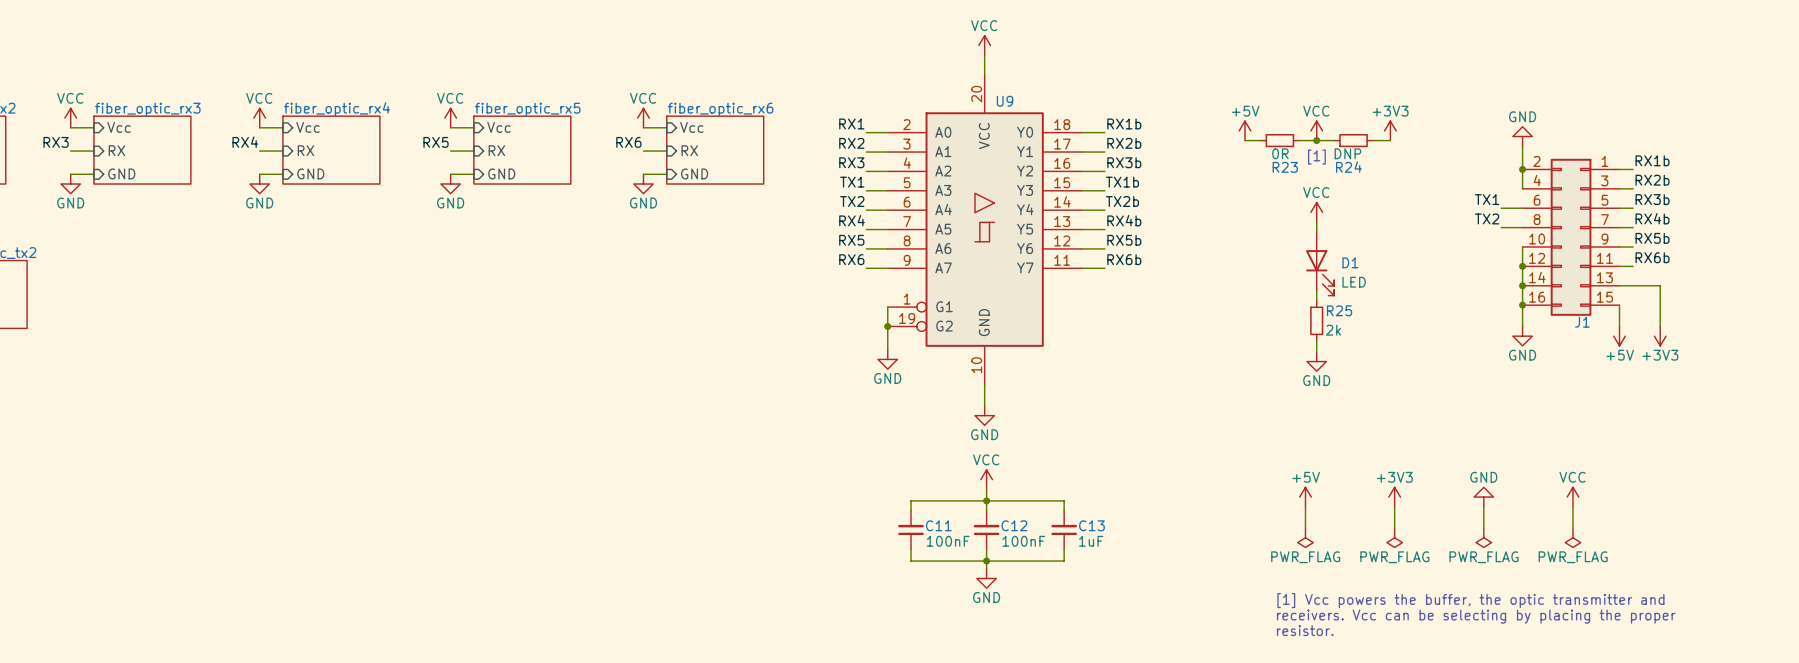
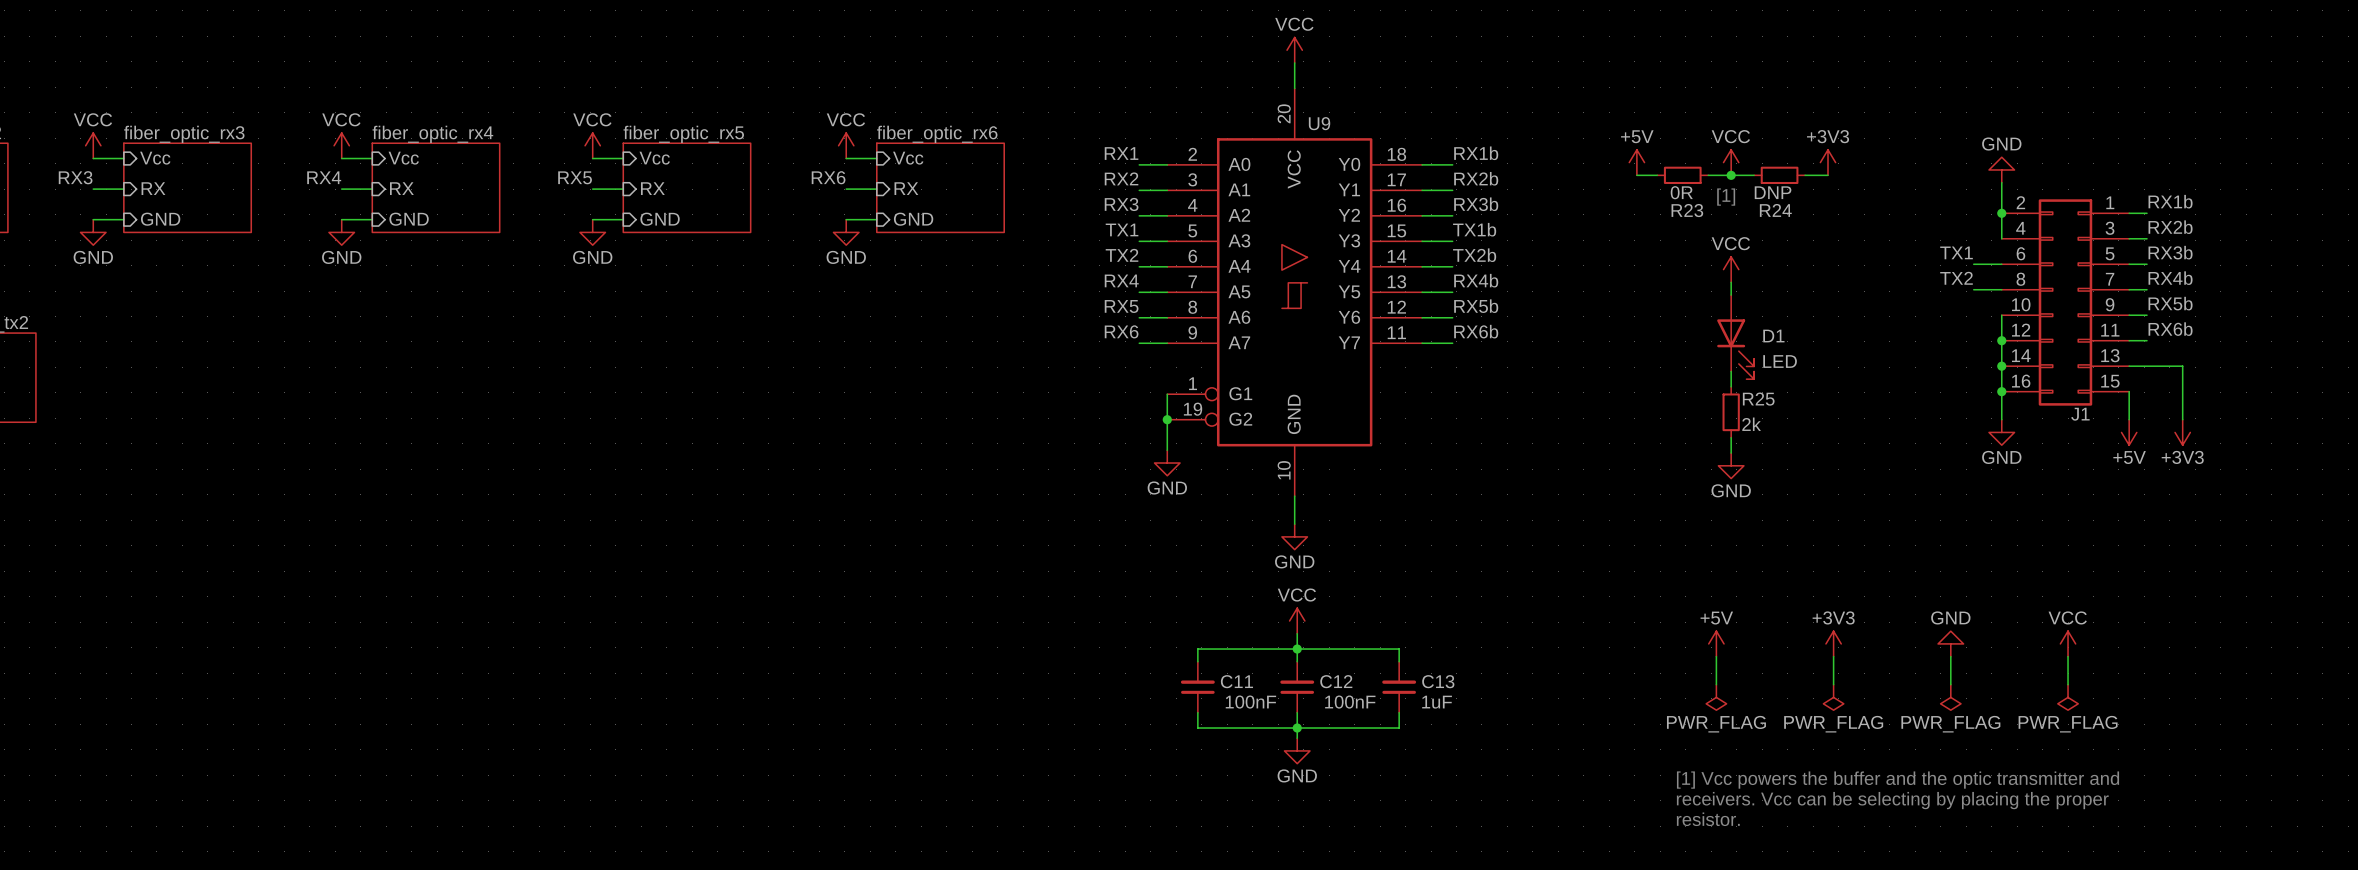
text: [1] Vcc powers the buffer, the optic transmitter and (1470, 600) -> [1] Vcc powers the buffer and the optic transmitter and (1898, 780)

